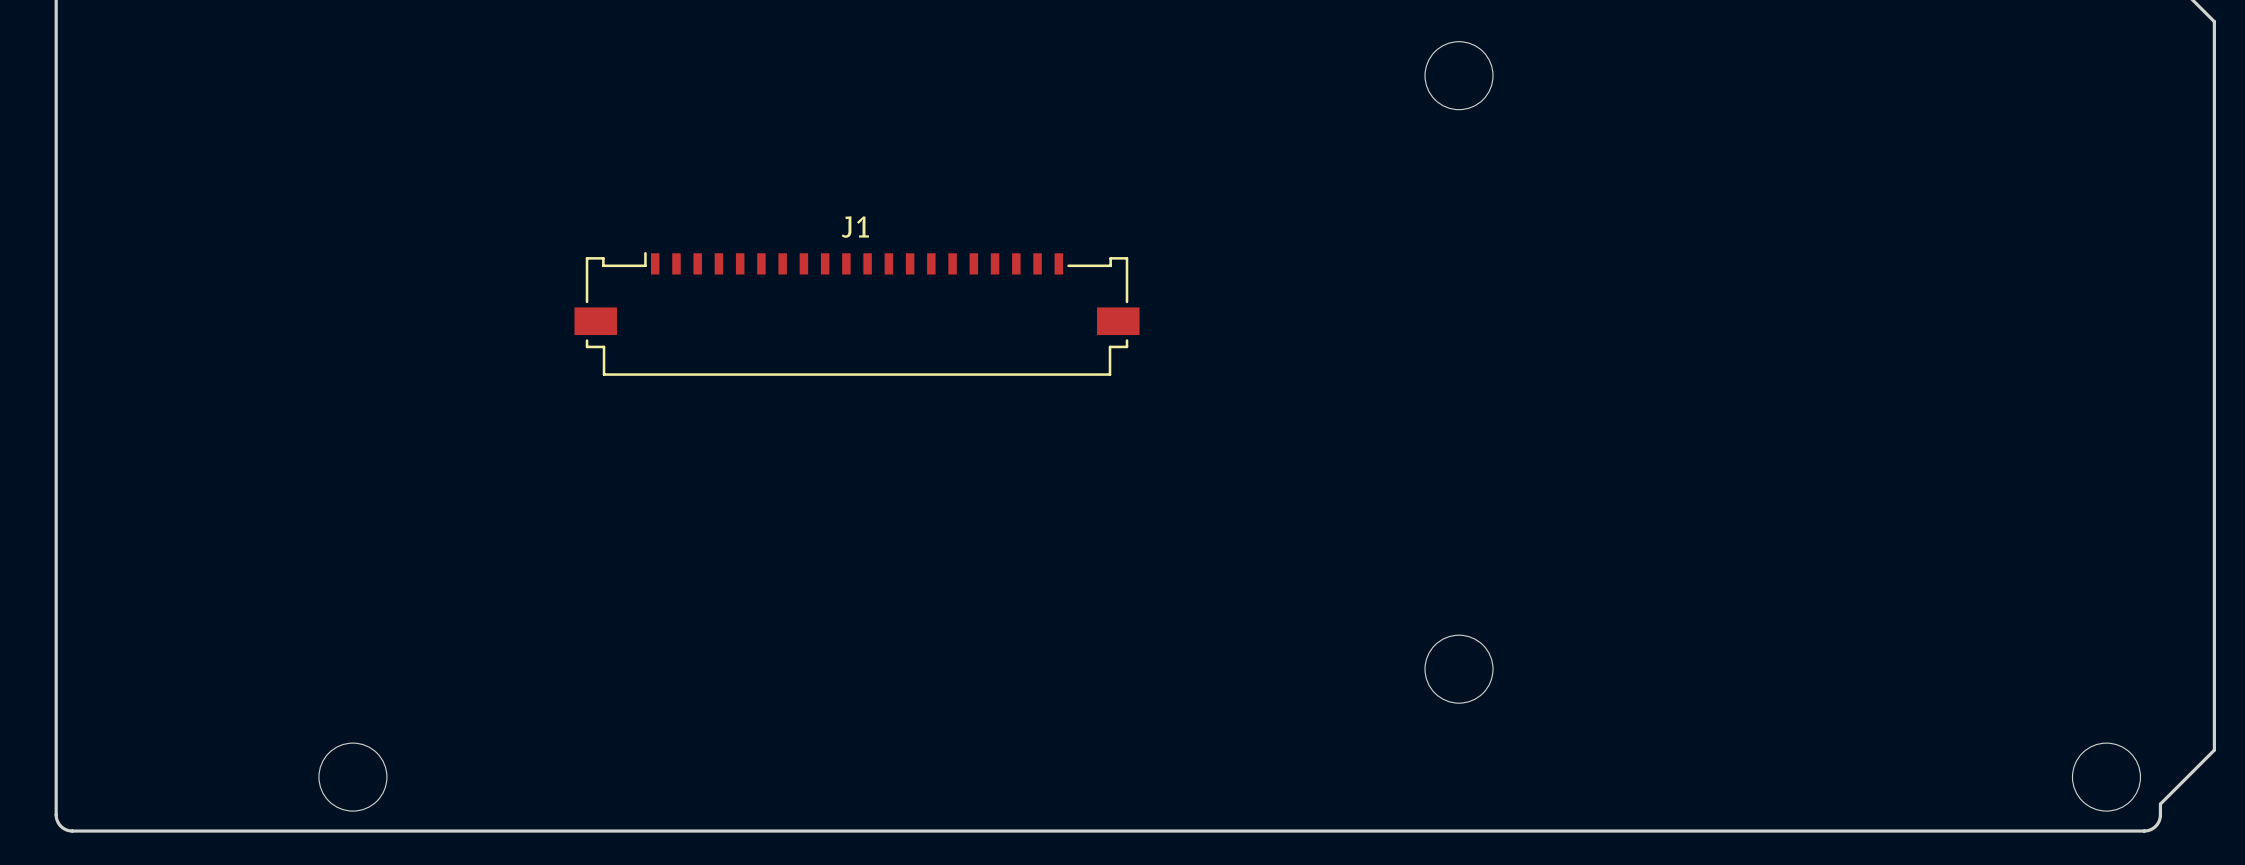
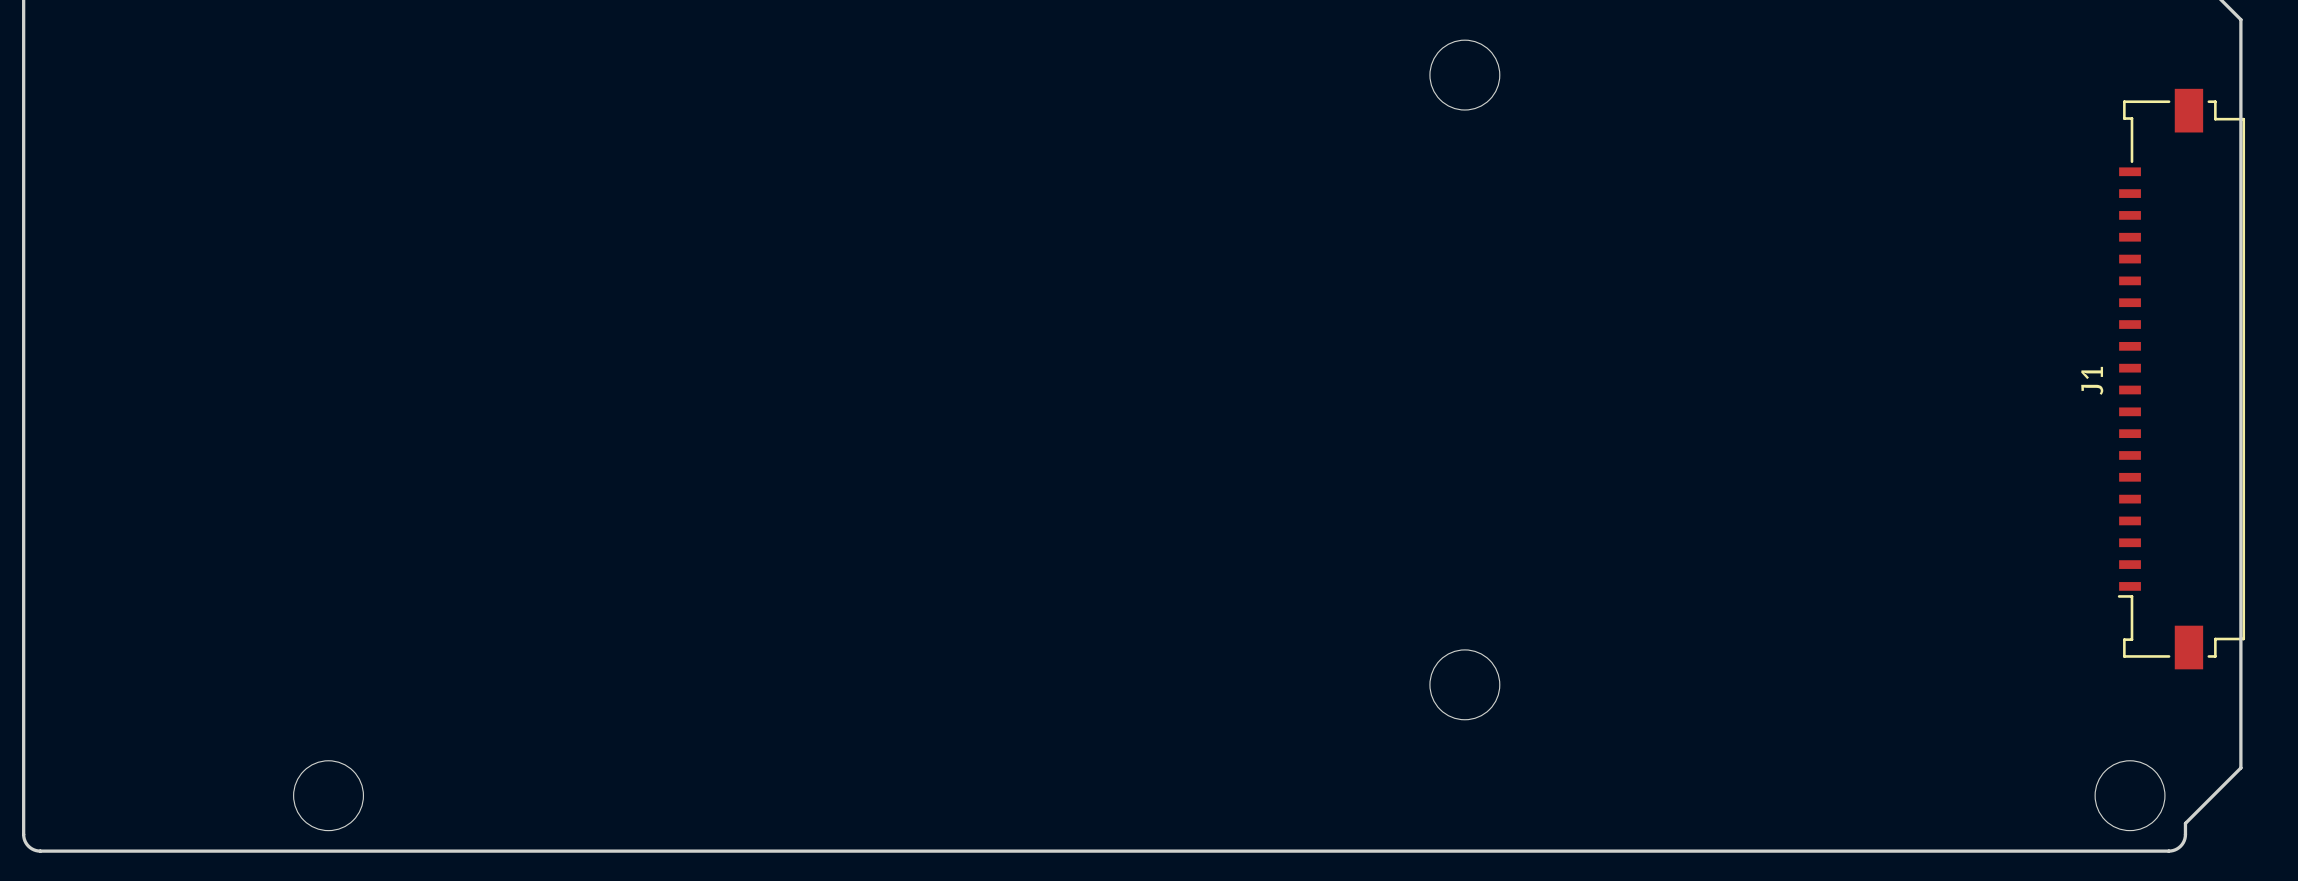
J1 rotation: 0° (857, 313) -> 90° counterclockwise (2181, 379)
J1 position: (857, 313) -> (2181, 379)

